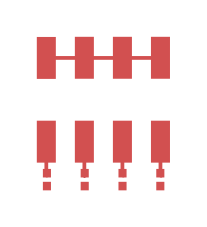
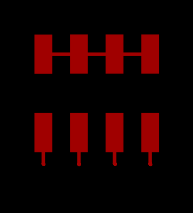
part: (46, 179) -> none
part: (84, 179) -> none
part: (122, 179) -> none
part: (160, 179) -> none

